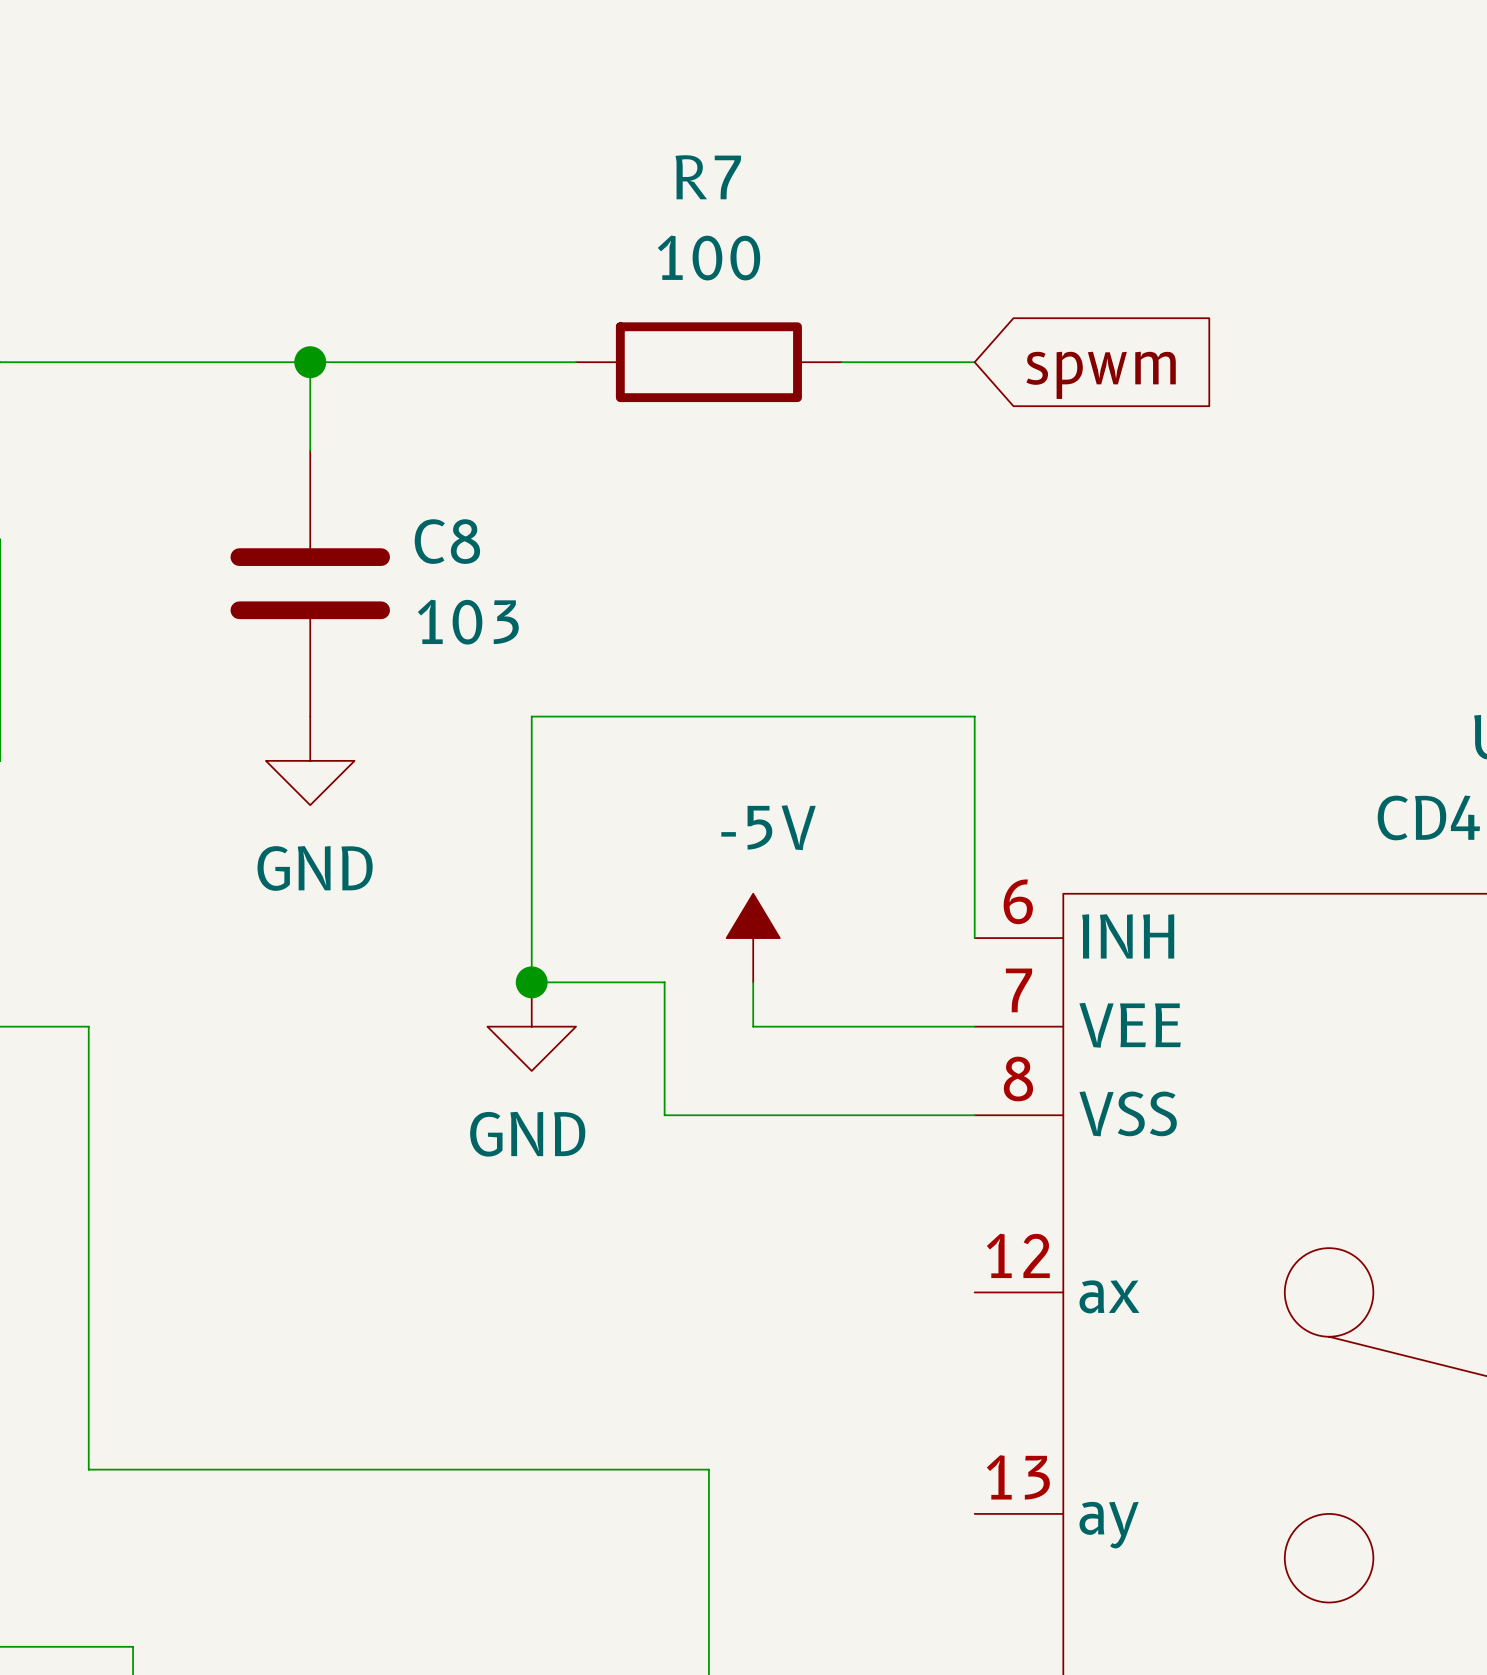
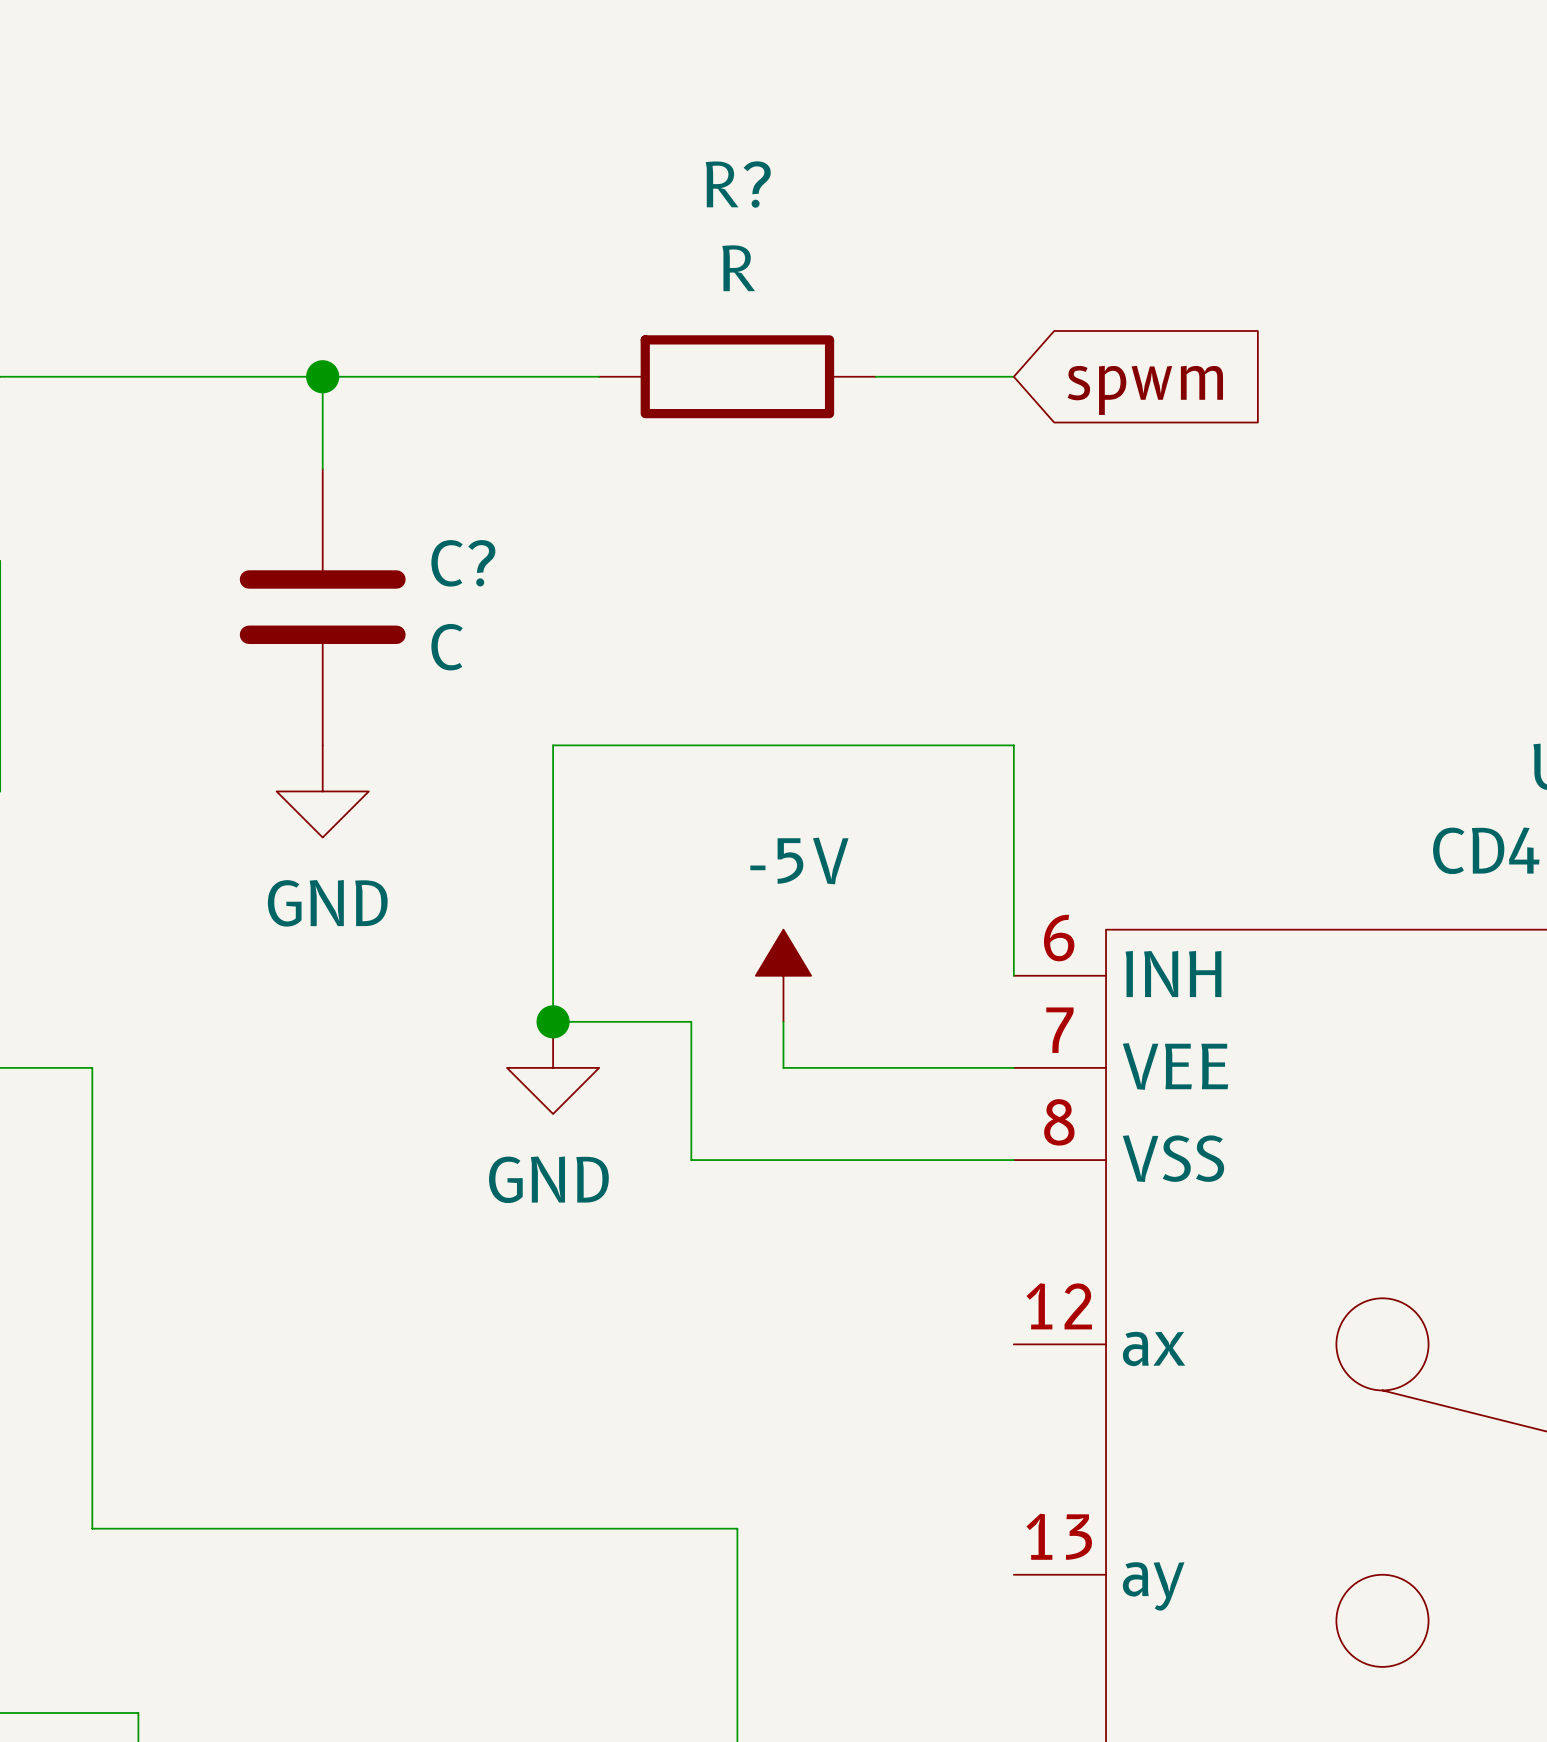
R7 name: R7 (708, 177) -> R? (738, 184)
R7 value: 100 (709, 258) -> R (738, 268)
C8 name: C8 (447, 541) -> C? (463, 563)
C8 value: 103 (468, 622) -> C (447, 647)

